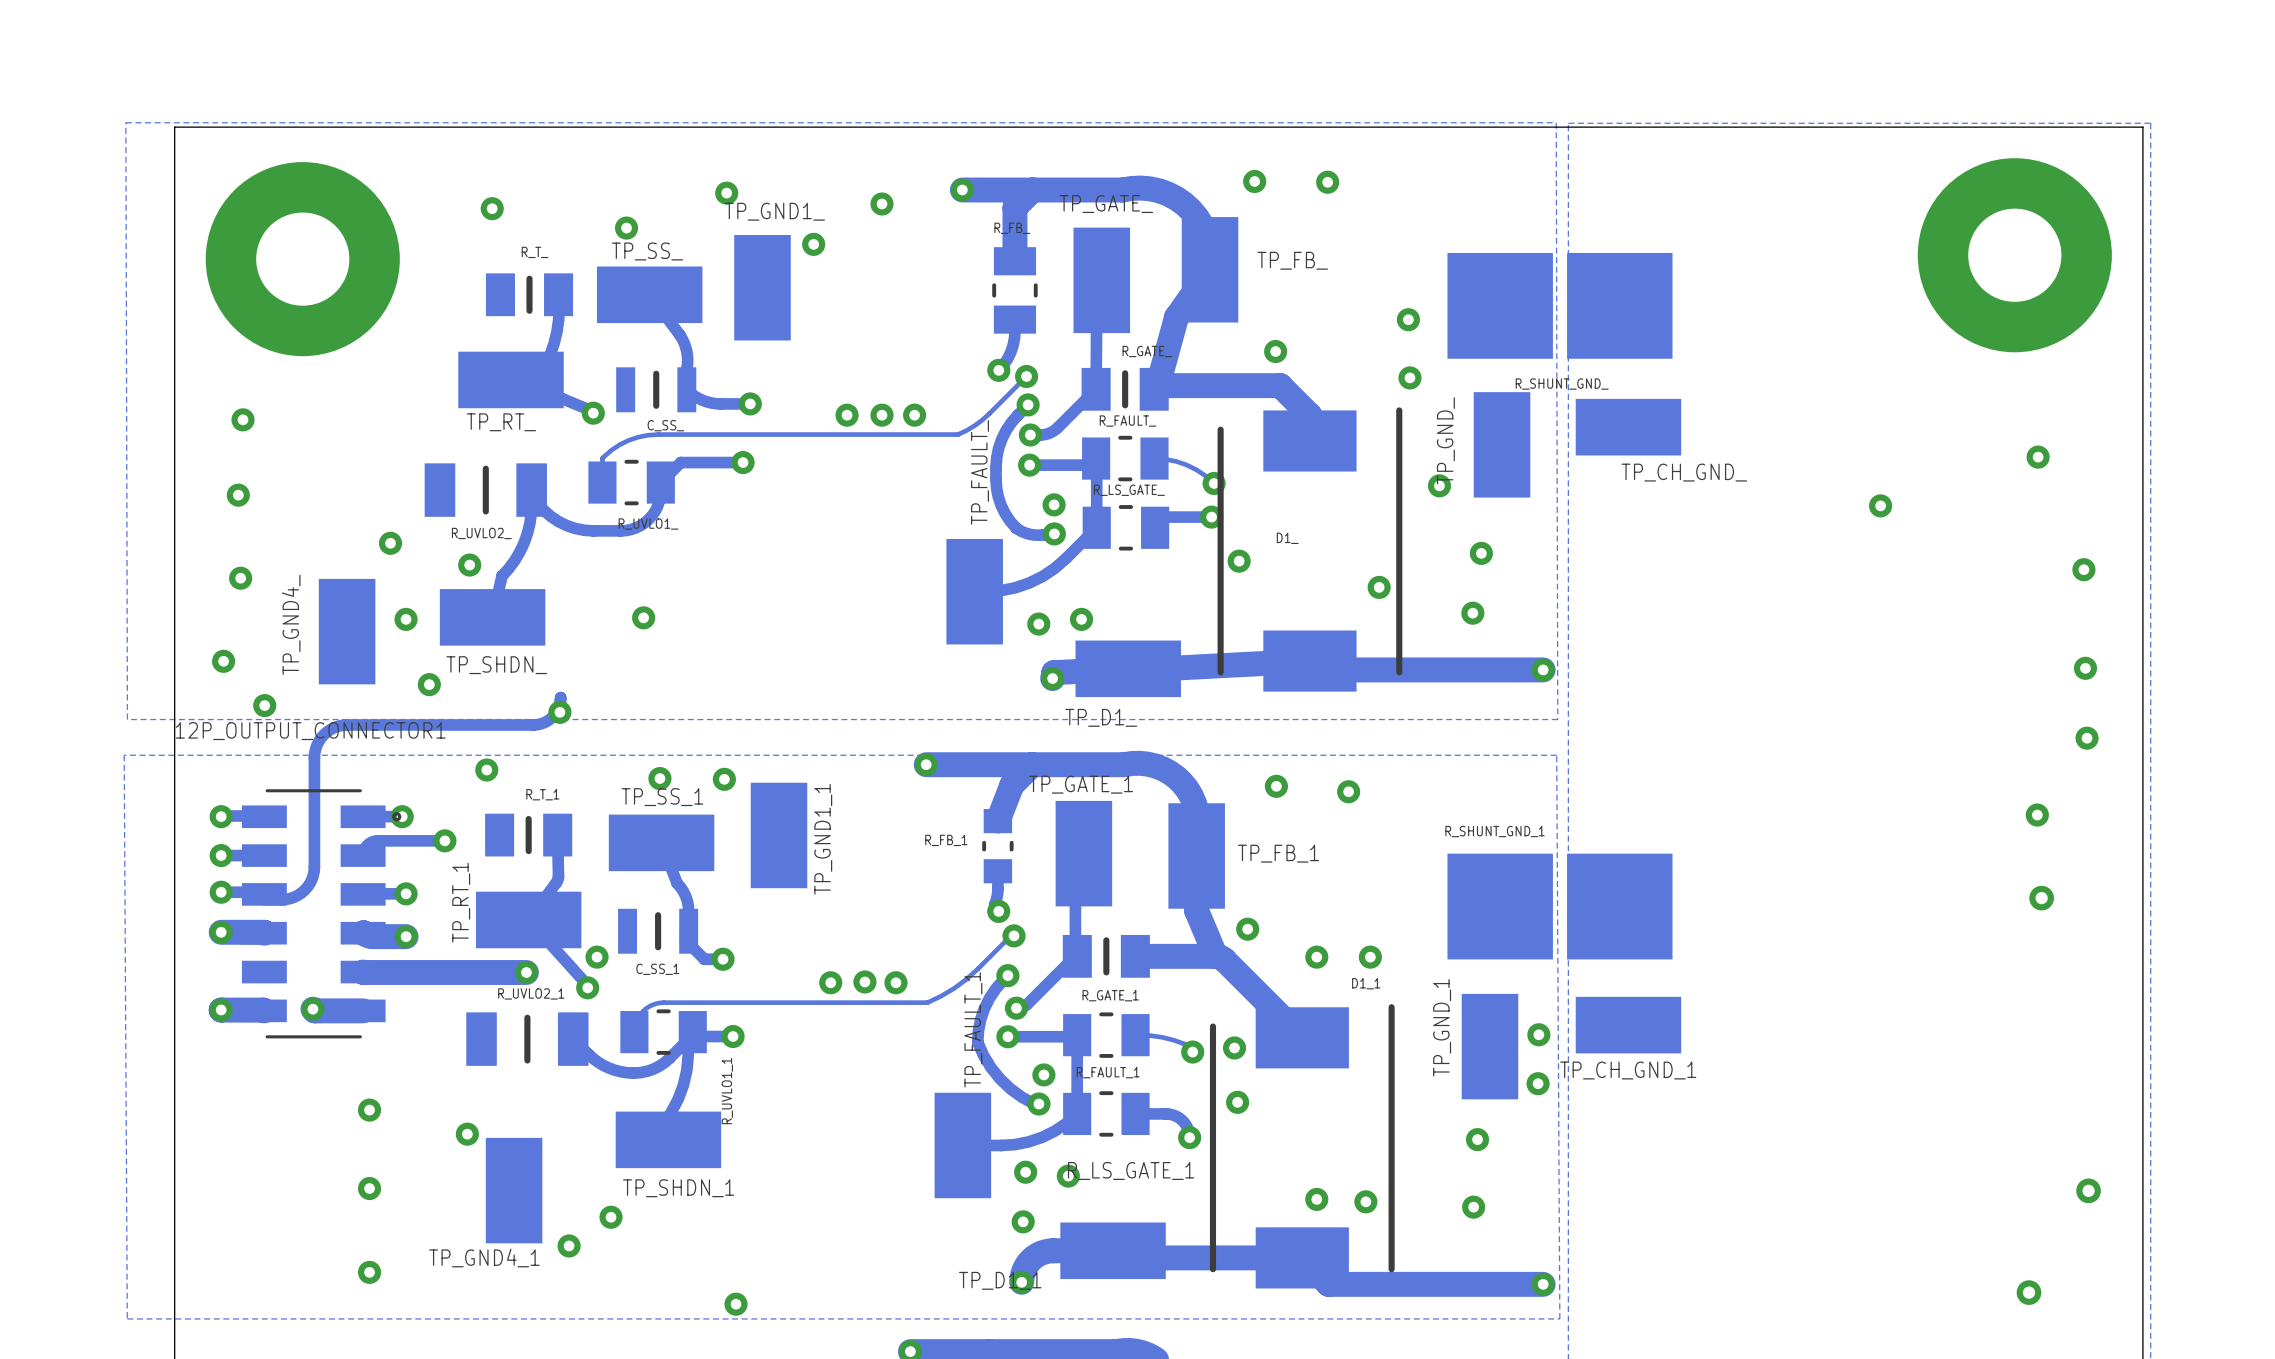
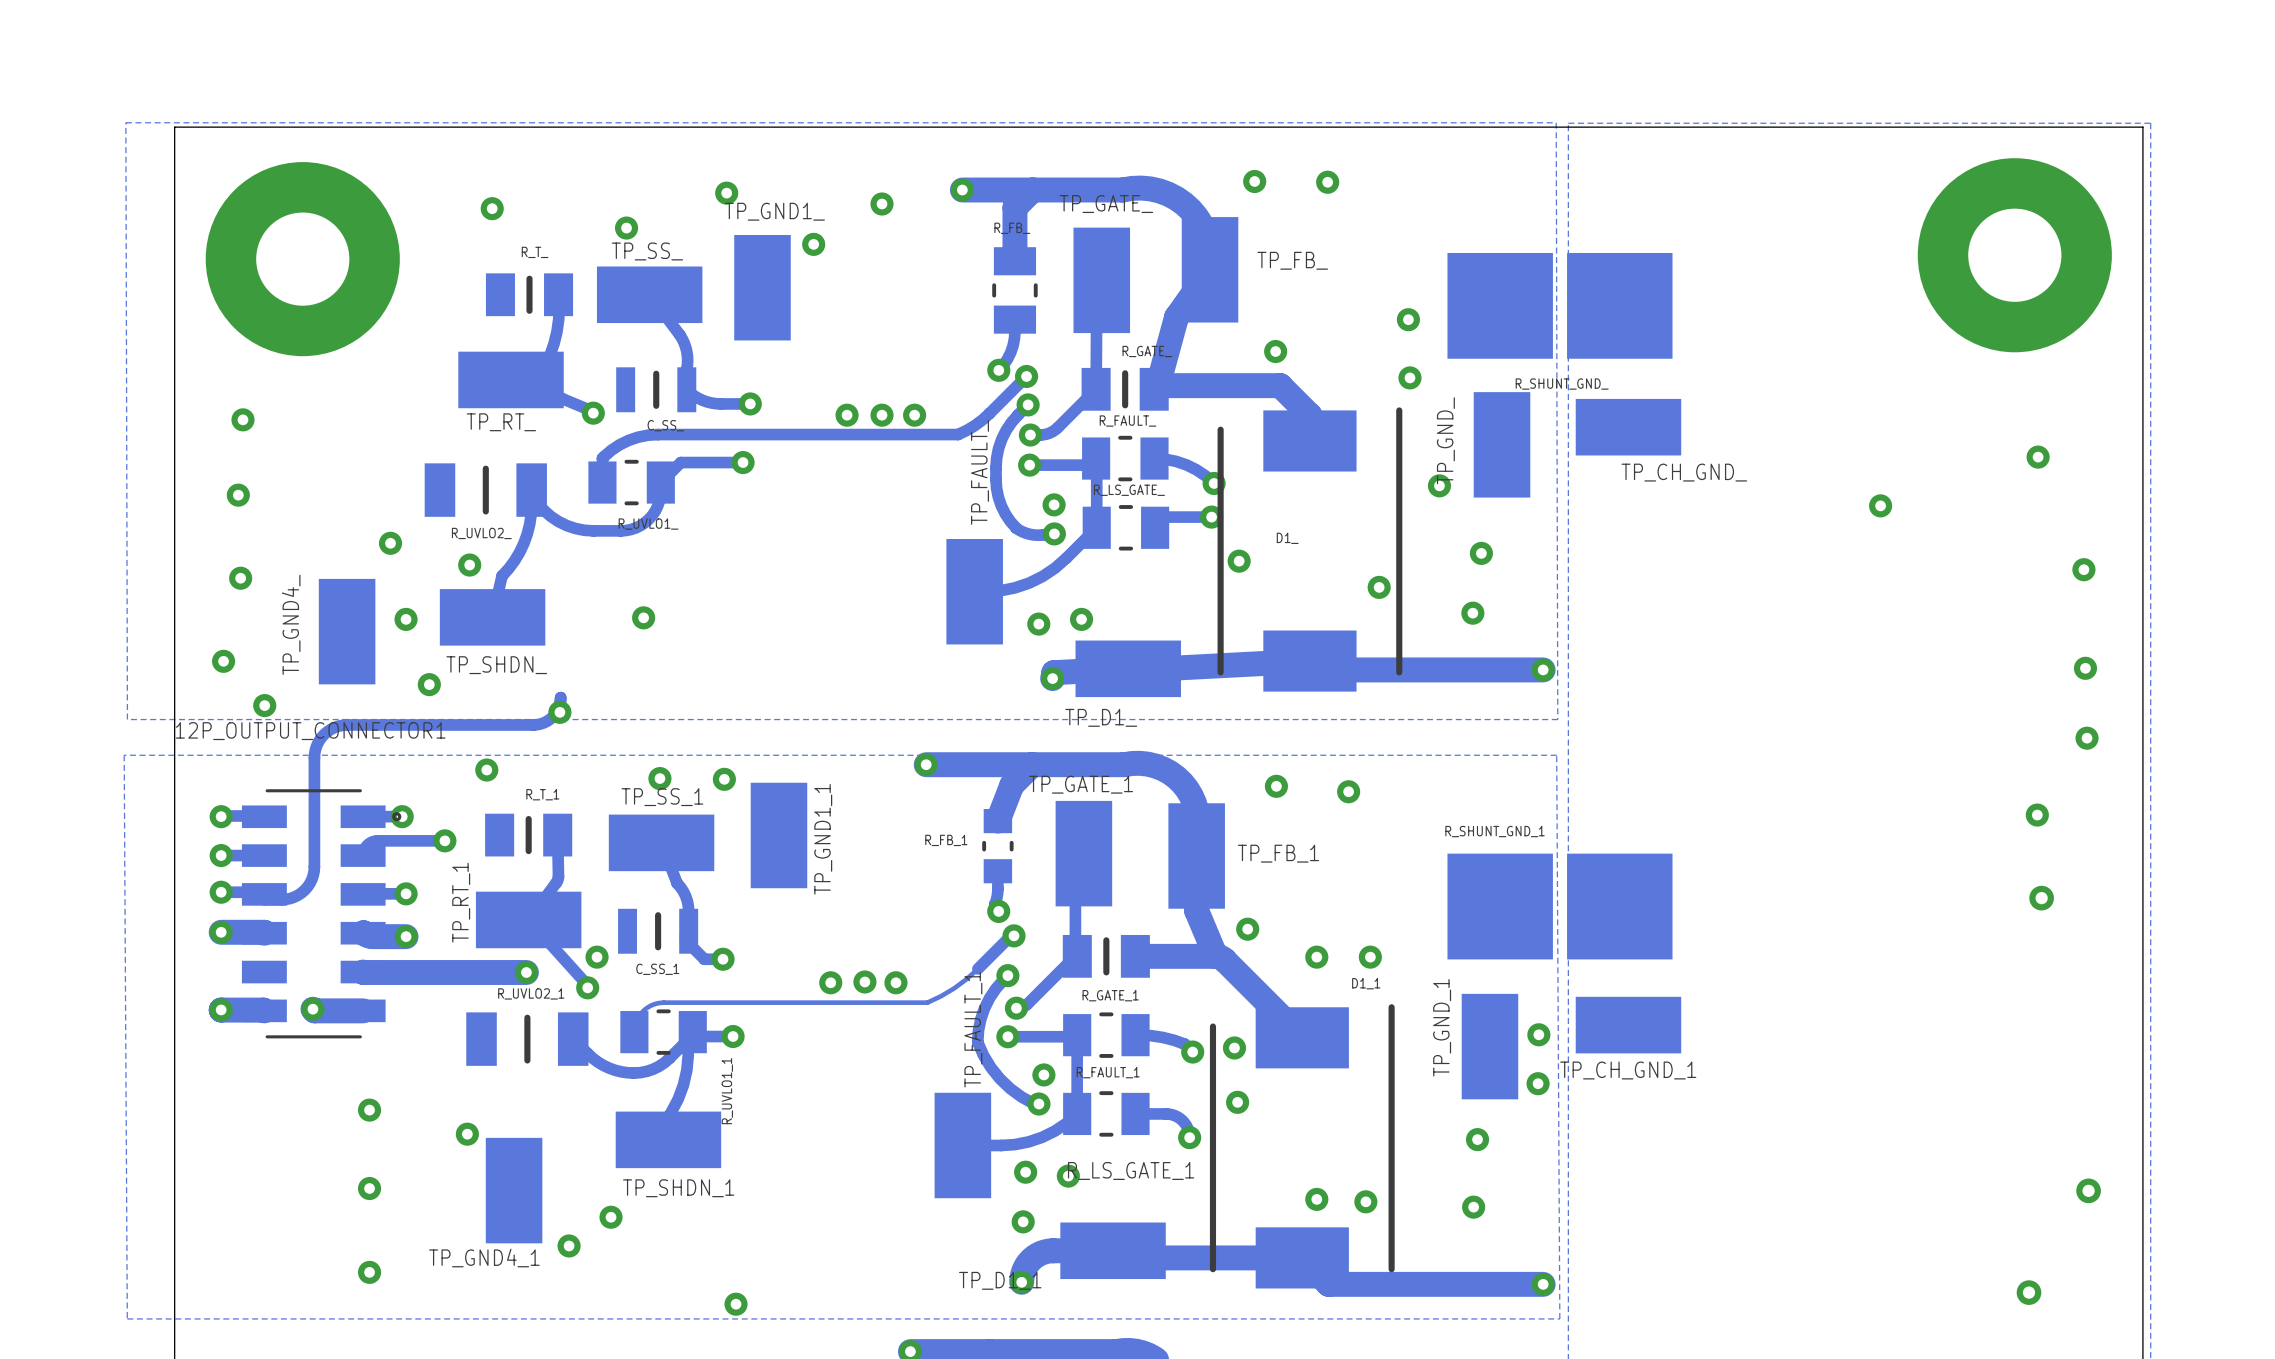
track width: thin (1026, 376) (982, 419) (958, 434) (647, 435) (619, 444) (602, 458) (602, 482) -> thick (1026, 376) (982, 419) (958, 434) (647, 435) (619, 444) (602, 458) (602, 482)
track width: thin (1154, 458) (1186, 464) (1213, 483) -> thick (1154, 458) (1186, 464) (1213, 483)
track width: thin (1014, 935) (1010, 935) (977, 968) -> thick (1014, 935) (1010, 935) (977, 968)
track width: thin (1135, 1035) (1173, 1040) (1184, 1044) (1192, 1052) -> thick (1135, 1035) (1173, 1040) (1184, 1044) (1192, 1052)

